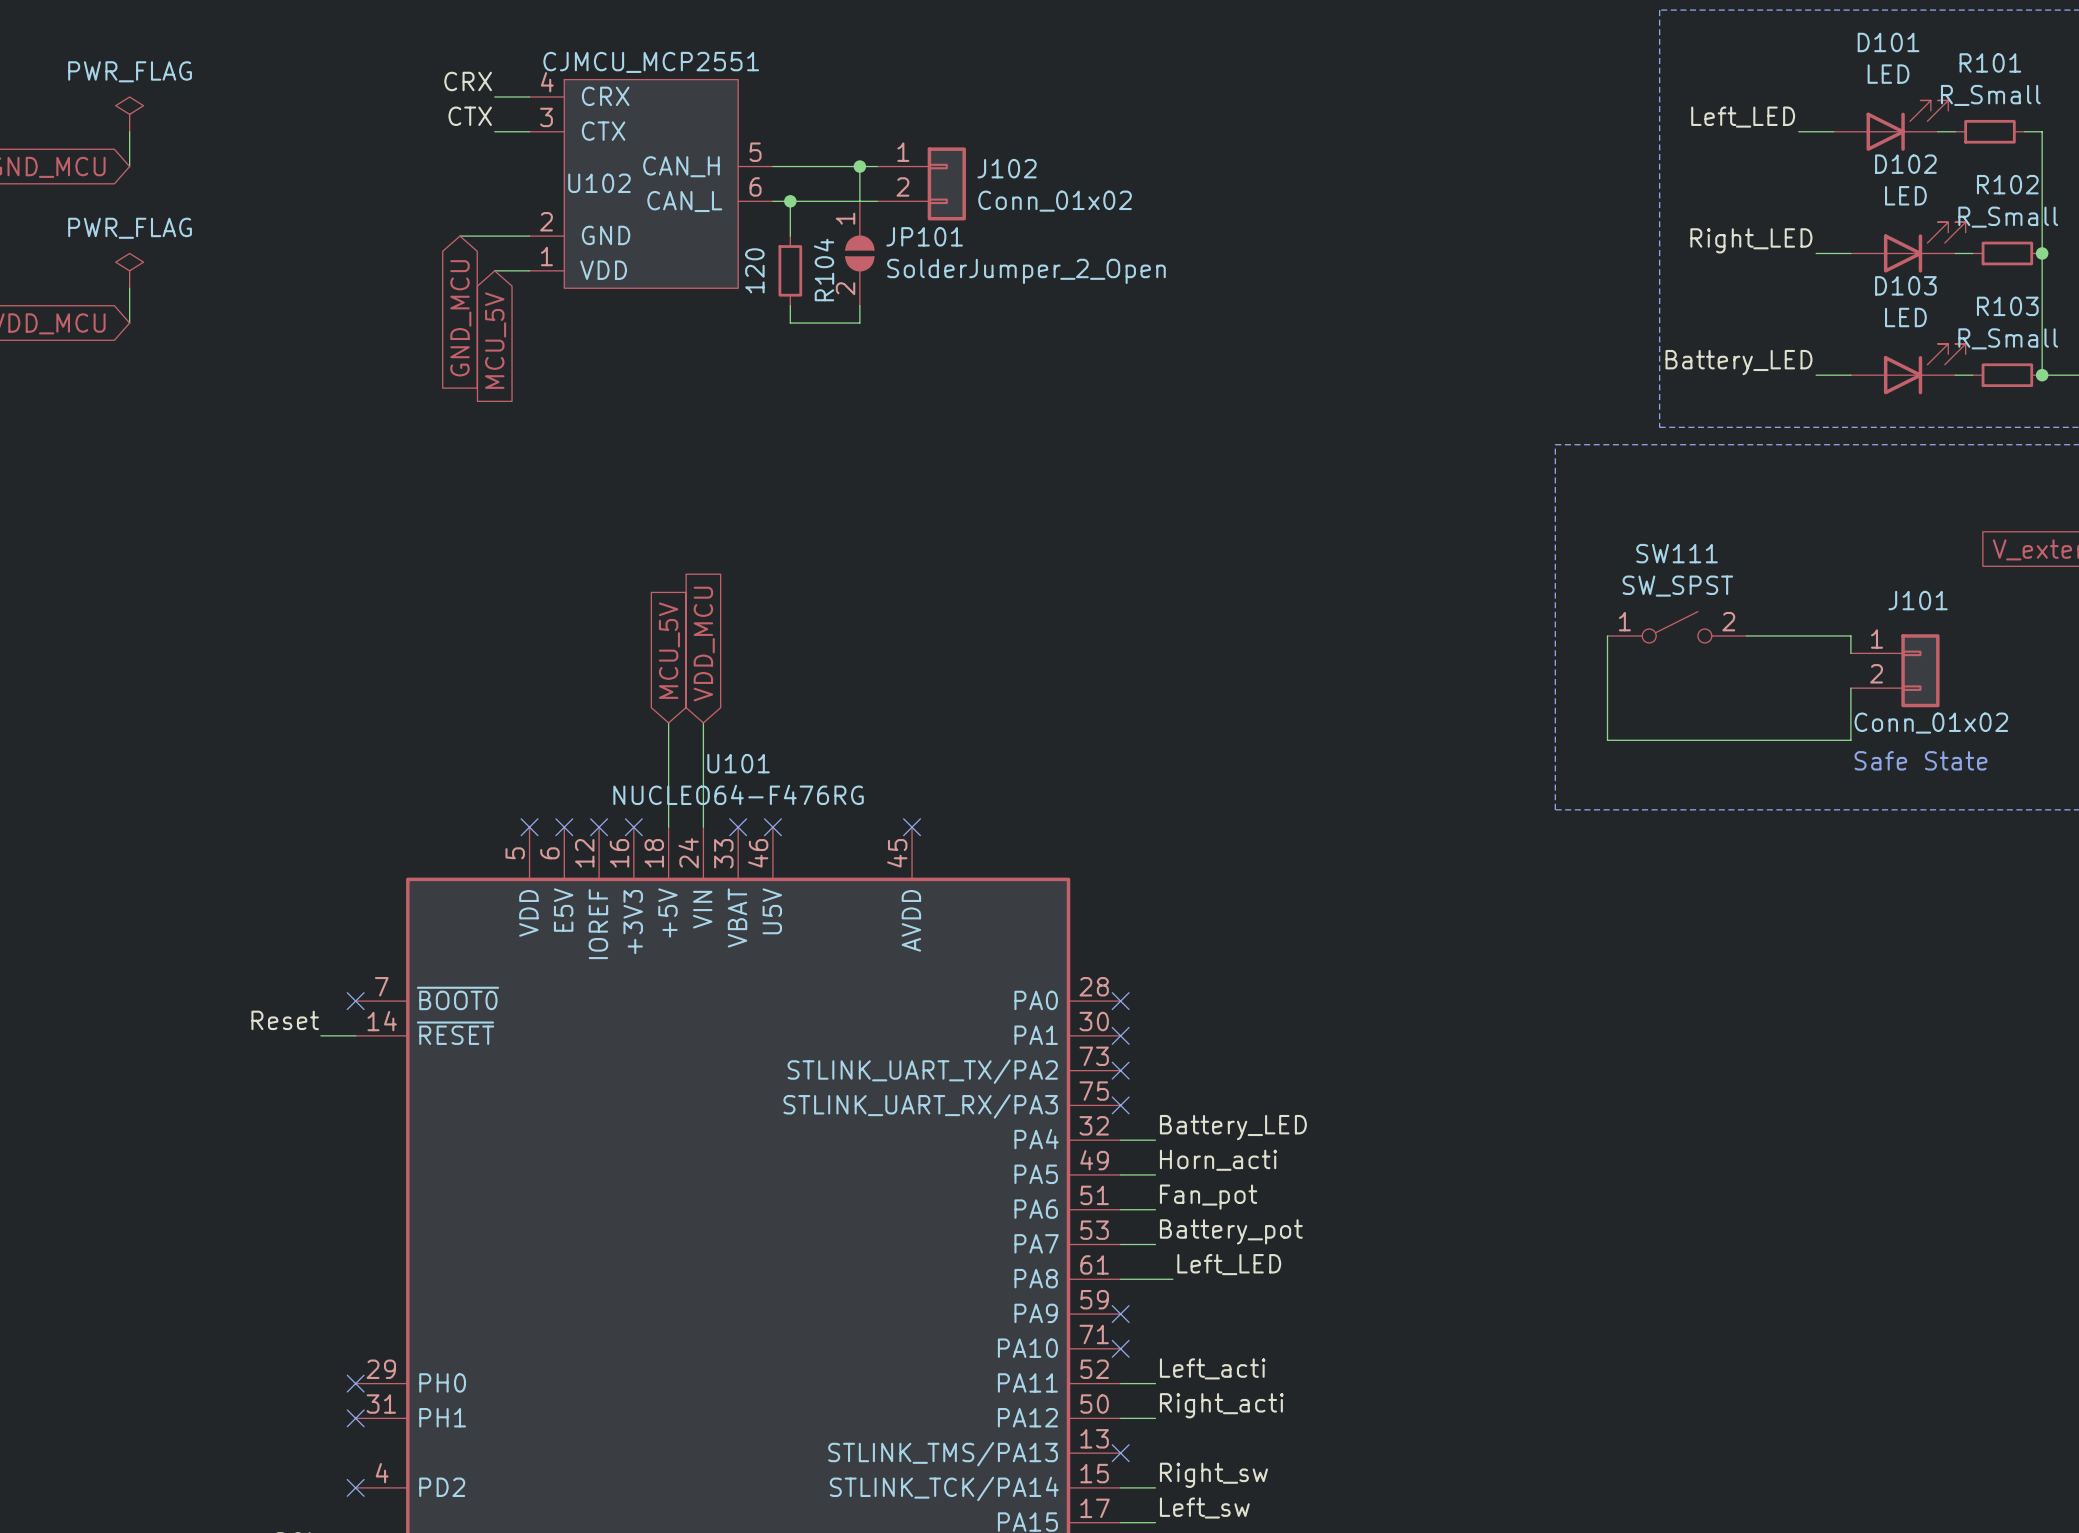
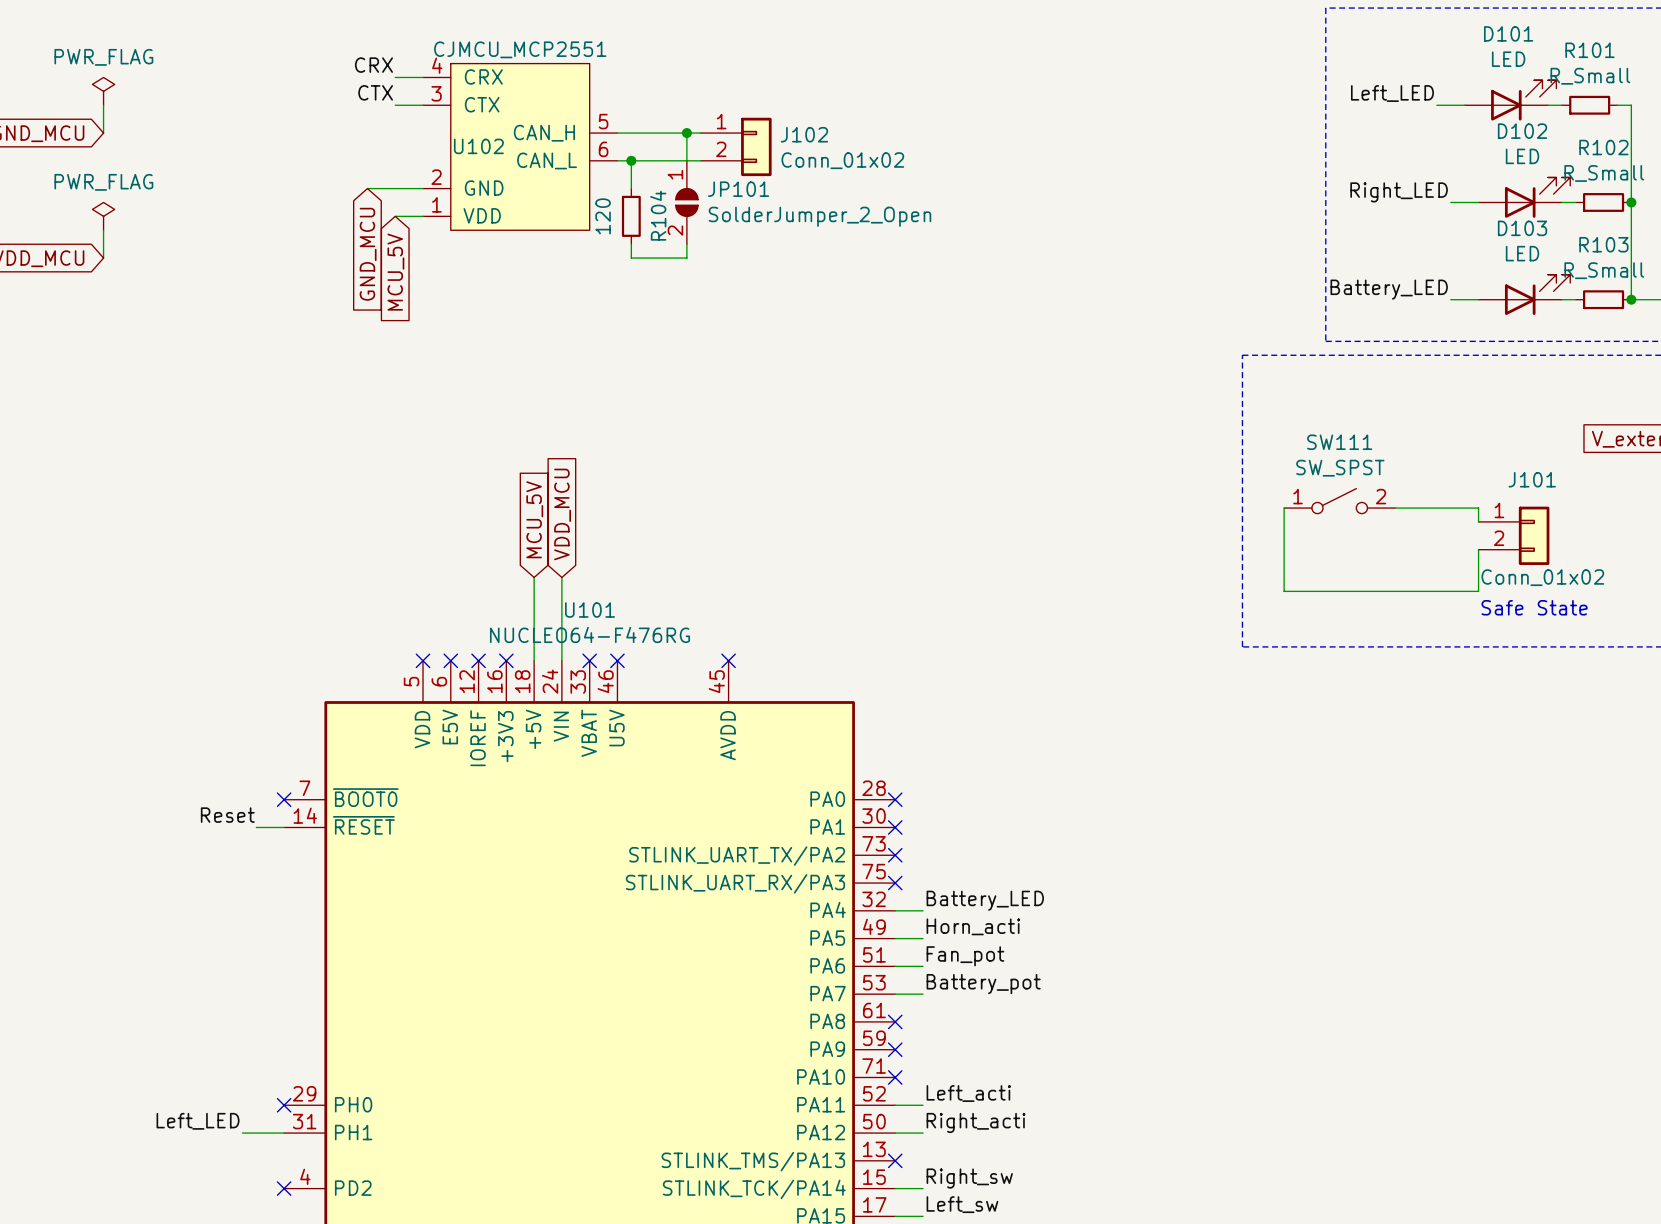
label: Left_LED (1229, 1264) -> none
wire: (1120, 1279) (1172, 1279) -> none
no-connect mark: none -> (895, 1021)
label: none -> Left_LED (198, 1121)
wire: none -> (242, 1133) (284, 1133)
no-connect mark: (355, 1418) -> none

